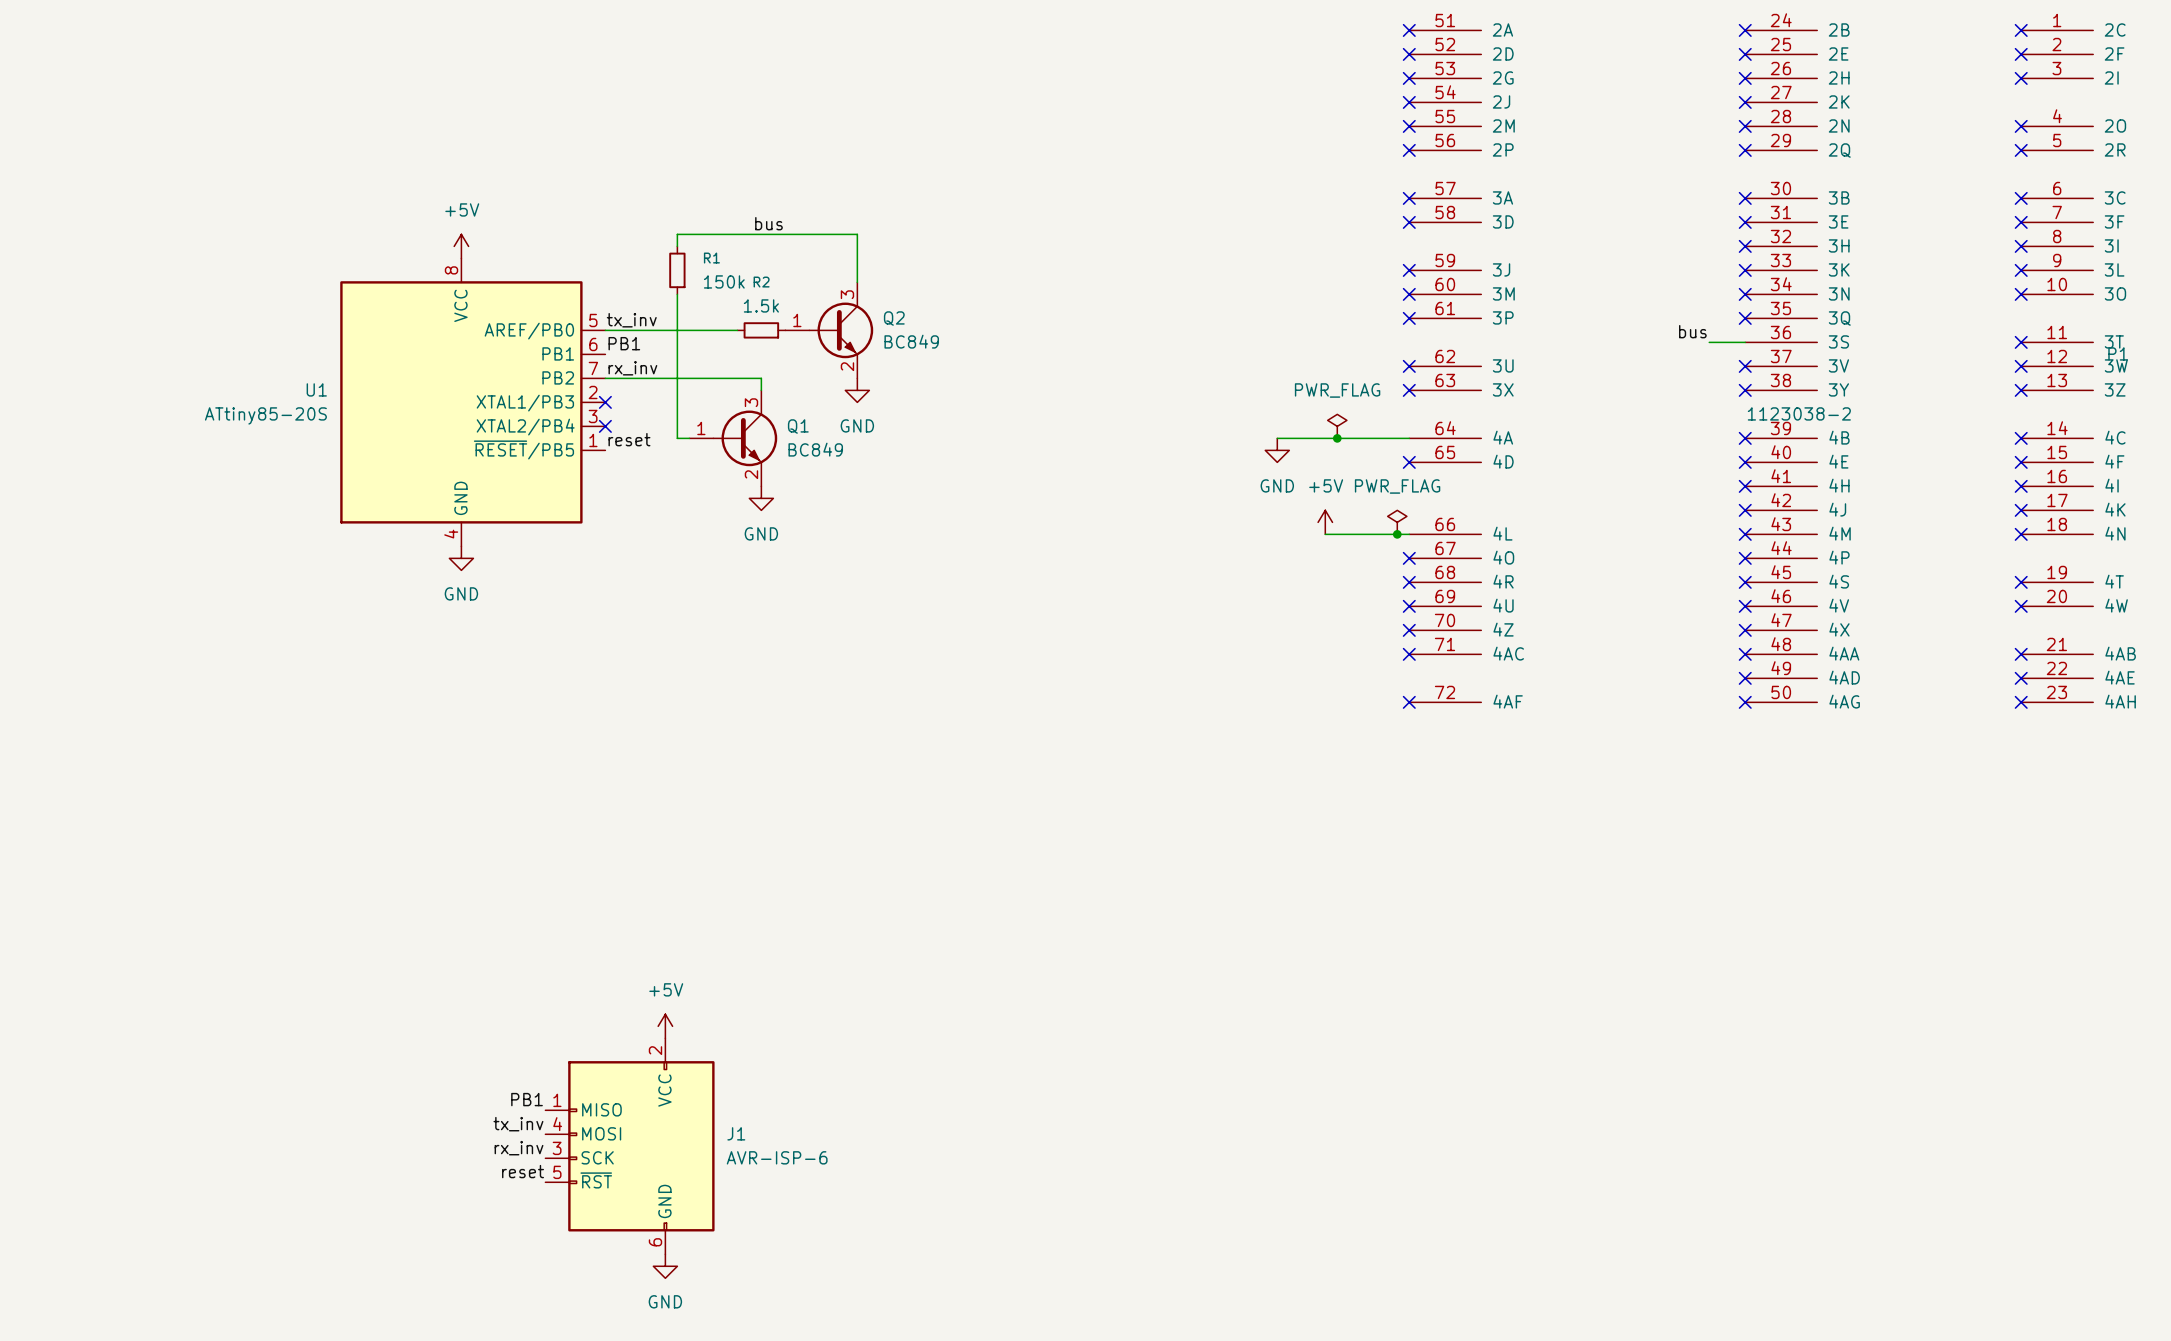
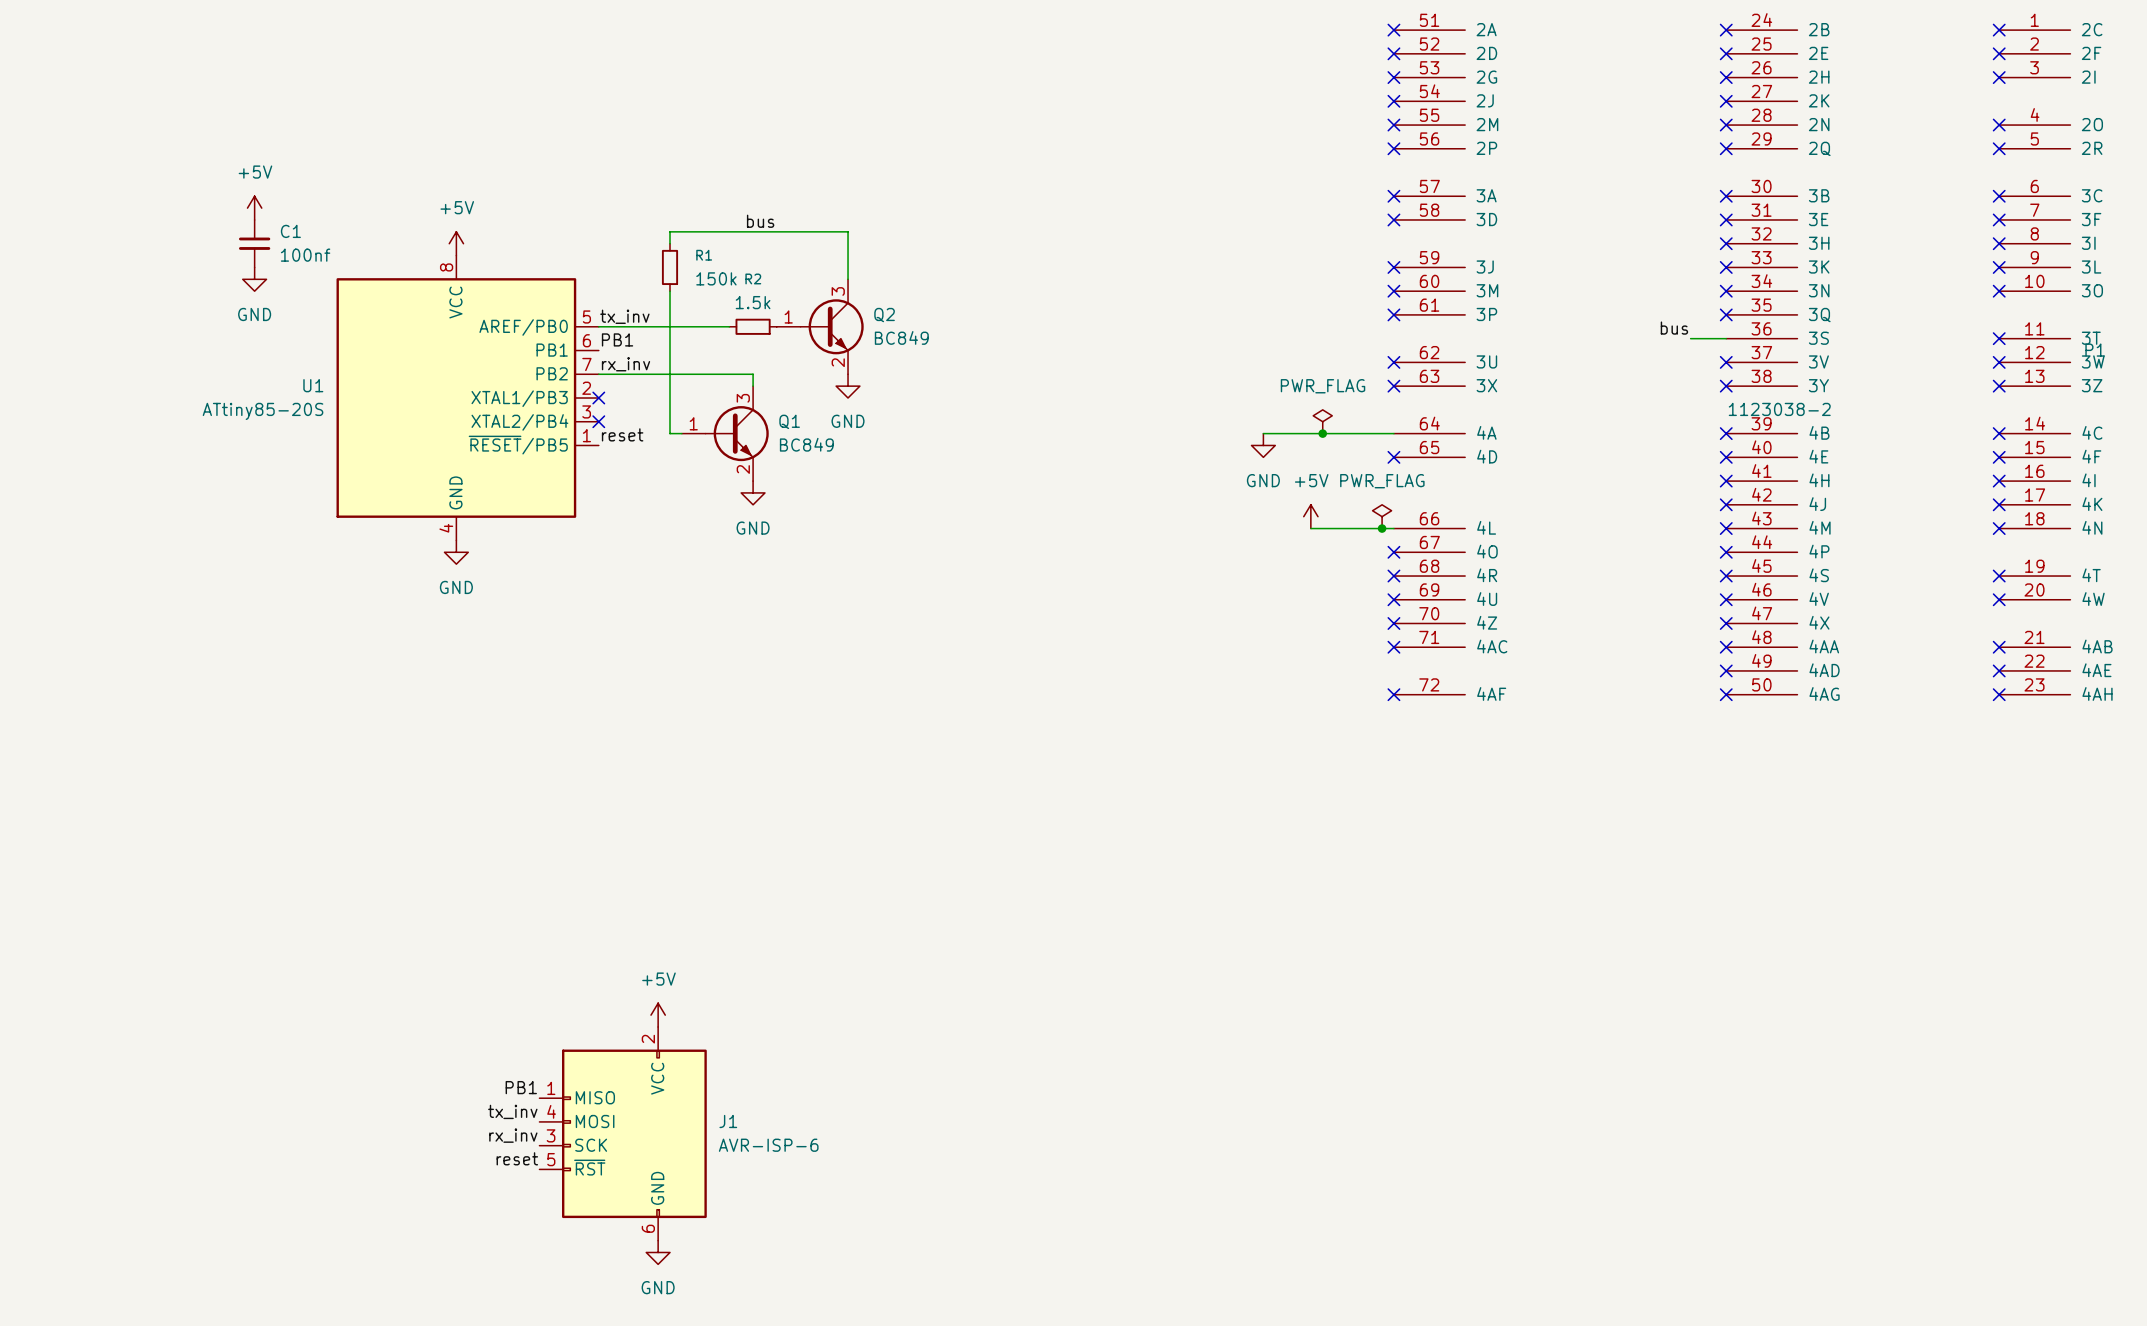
power symbol: none -> +5V (254, 208)
C1: none -> 100nf (254, 243)
power symbol: none -> GND (254, 279)

